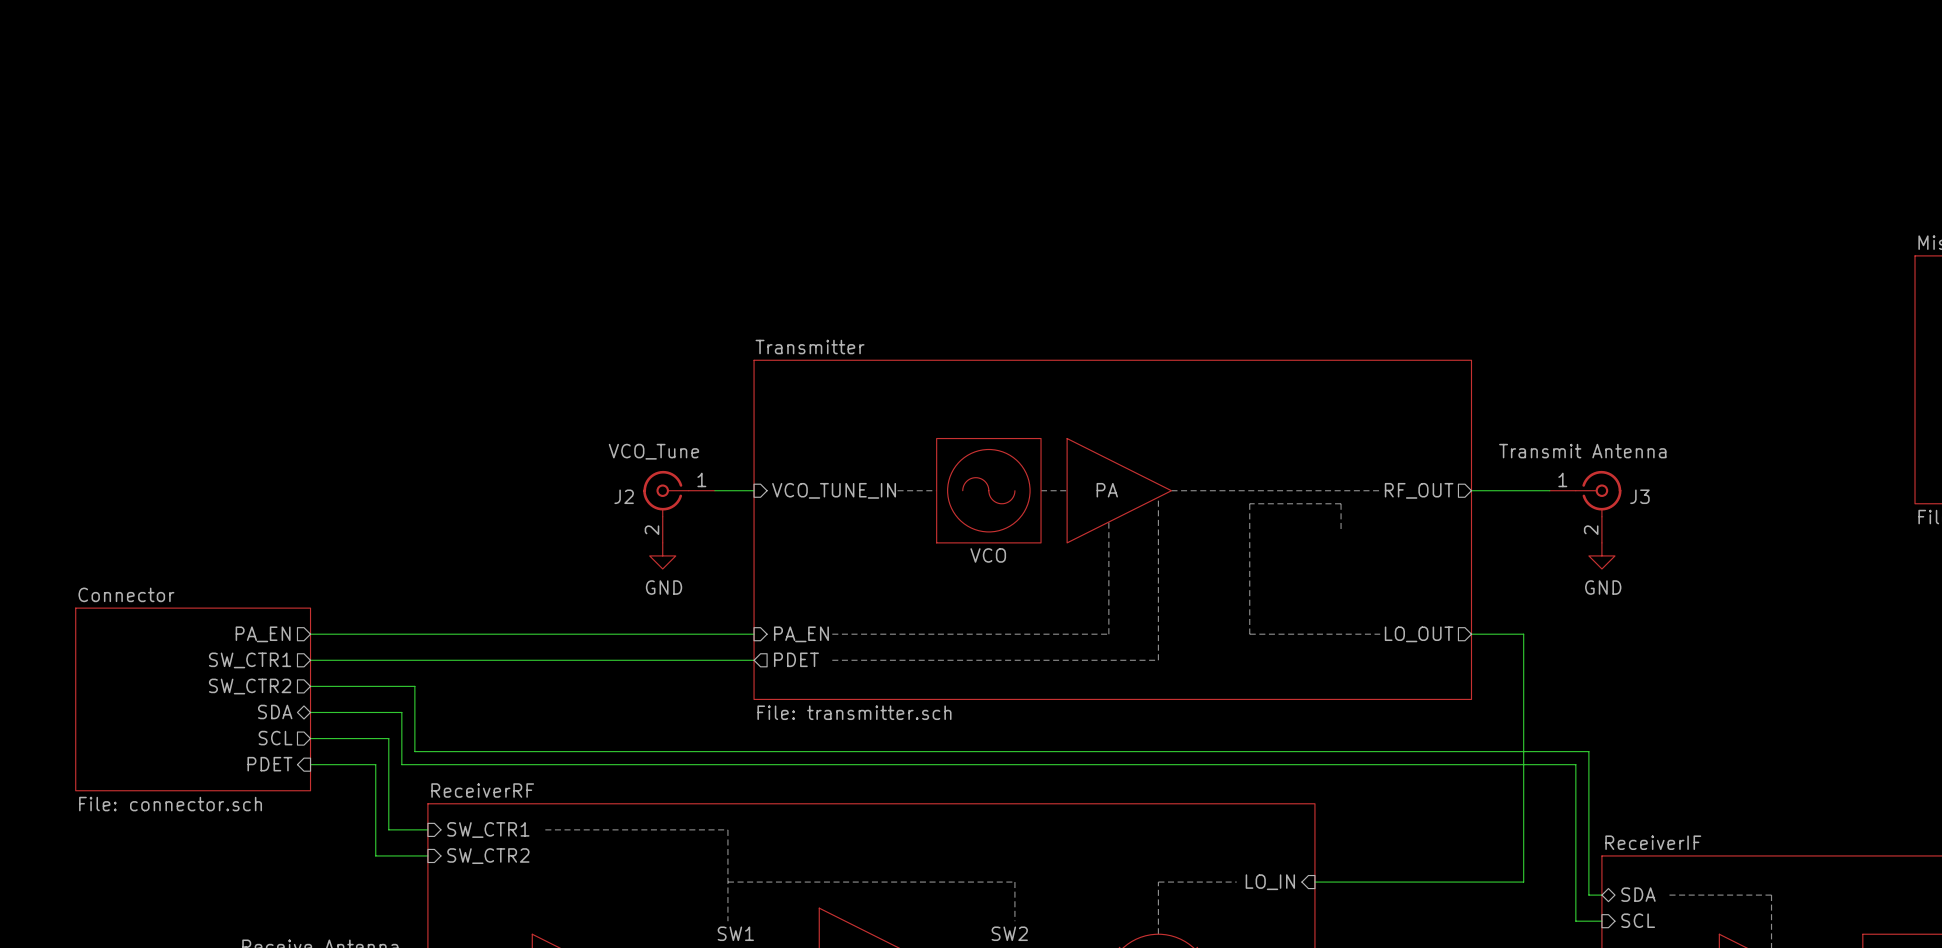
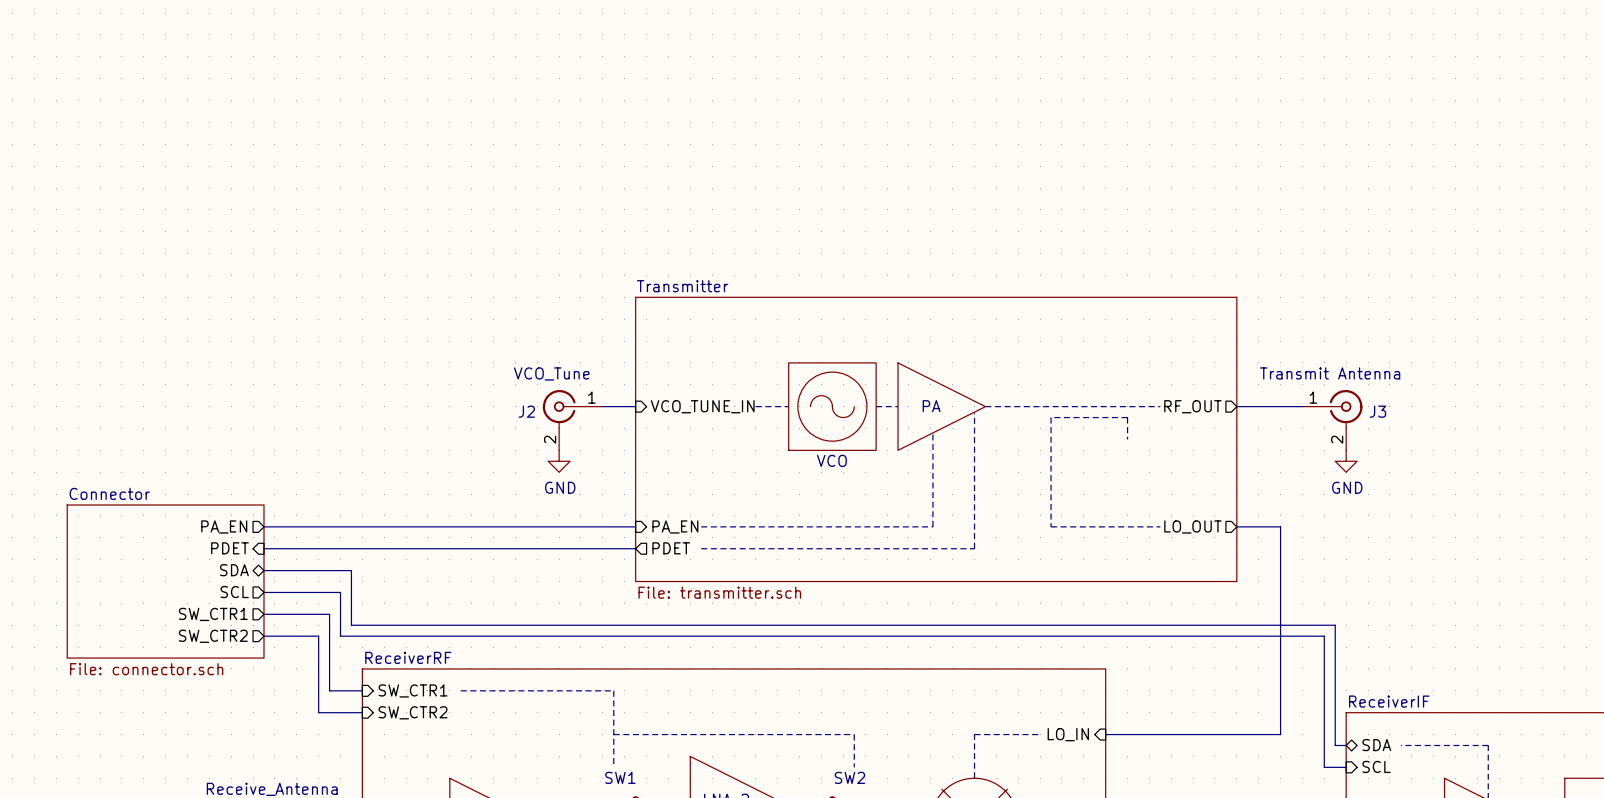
sheet pin shape: output (250, 660) -> input (229, 548)
sheet pin: SW_CTR1 (250, 660) -> PDET (229, 548)
sheet pin shape: output (250, 686) -> bidirectional (234, 570)
sheet pin: SW_CTR2 (250, 686) -> SDA (234, 570)
sheet pin shape: bidirectional (275, 711) -> output (234, 592)
sheet pin: SDA (275, 711) -> SCL (234, 592)
sheet pin: SCL (275, 738) -> SW_CTR1 (213, 614)
sheet pin shape: input (269, 764) -> output (213, 636)
sheet pin: PDET (269, 764) -> SW_CTR2 (213, 636)

